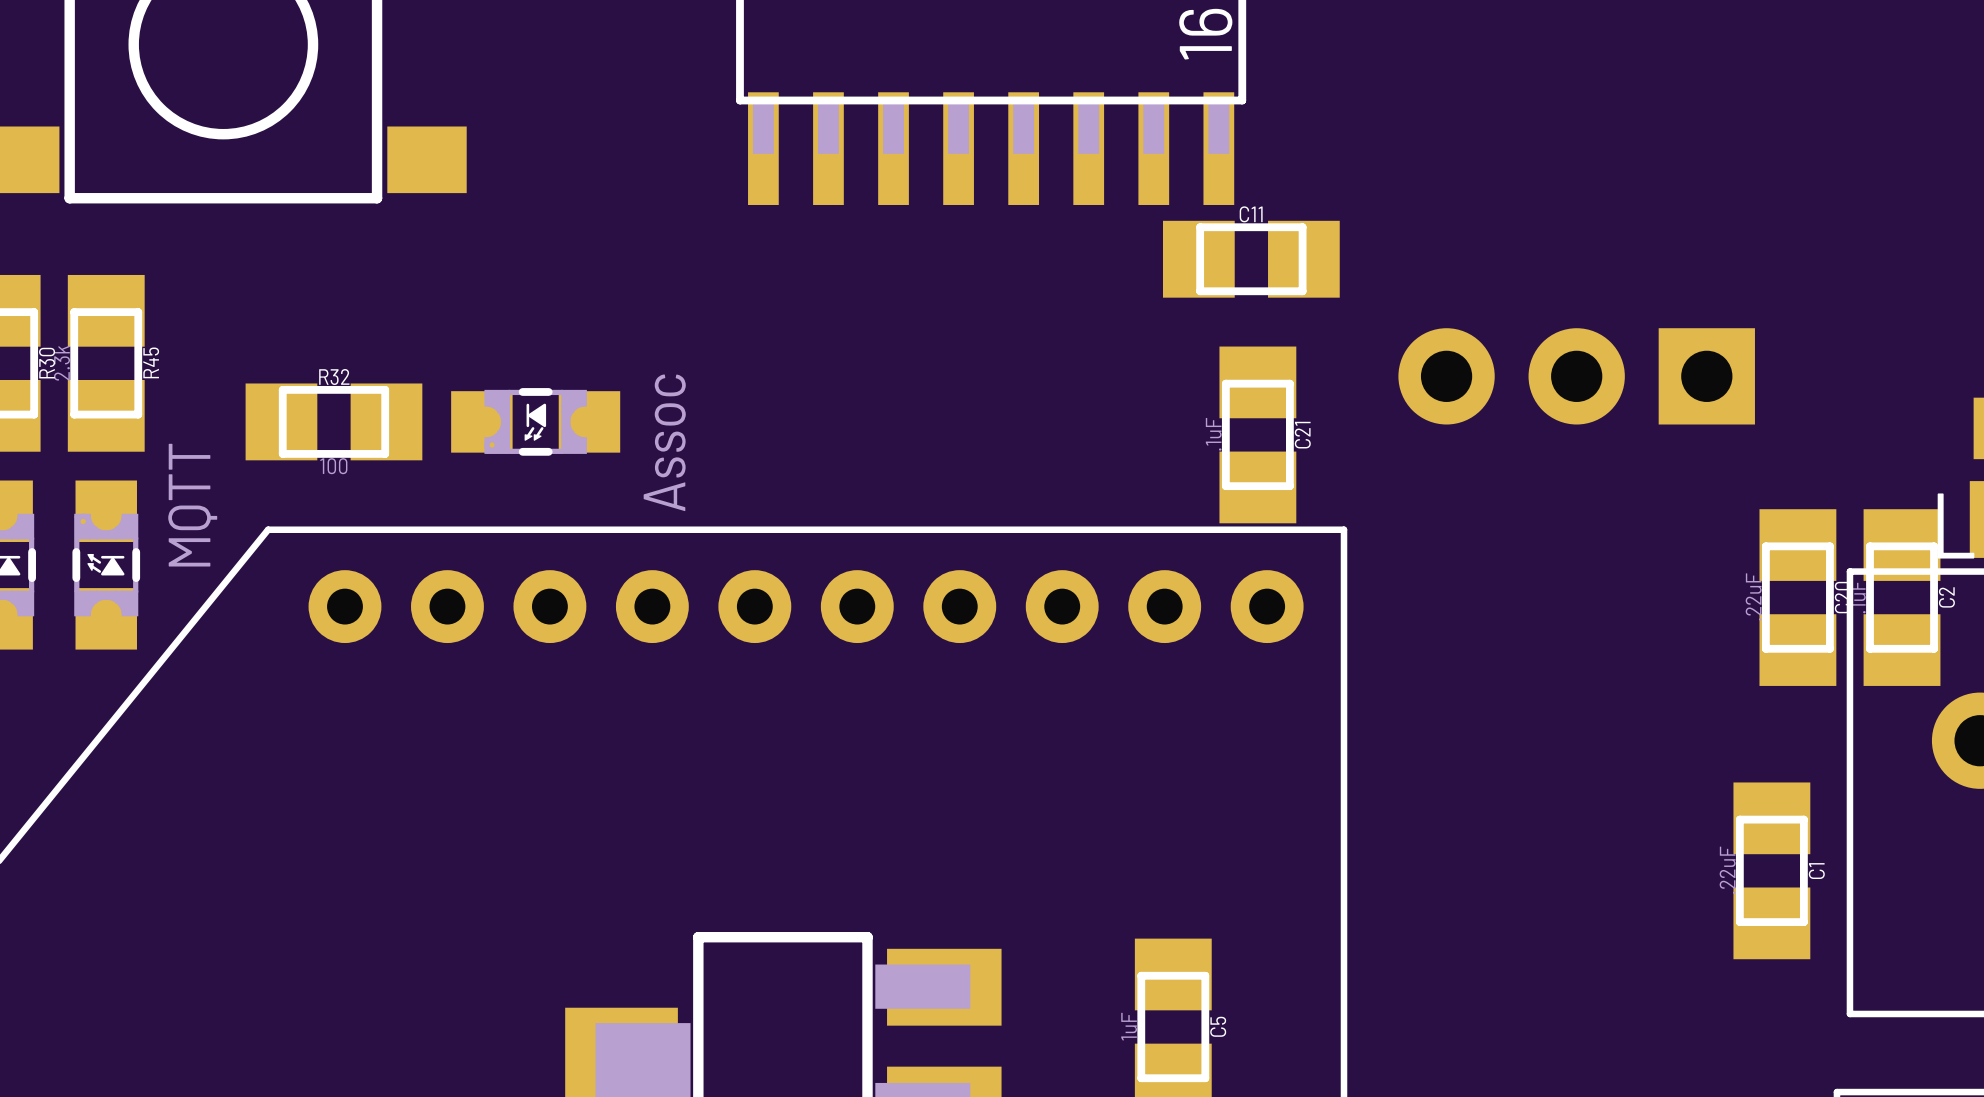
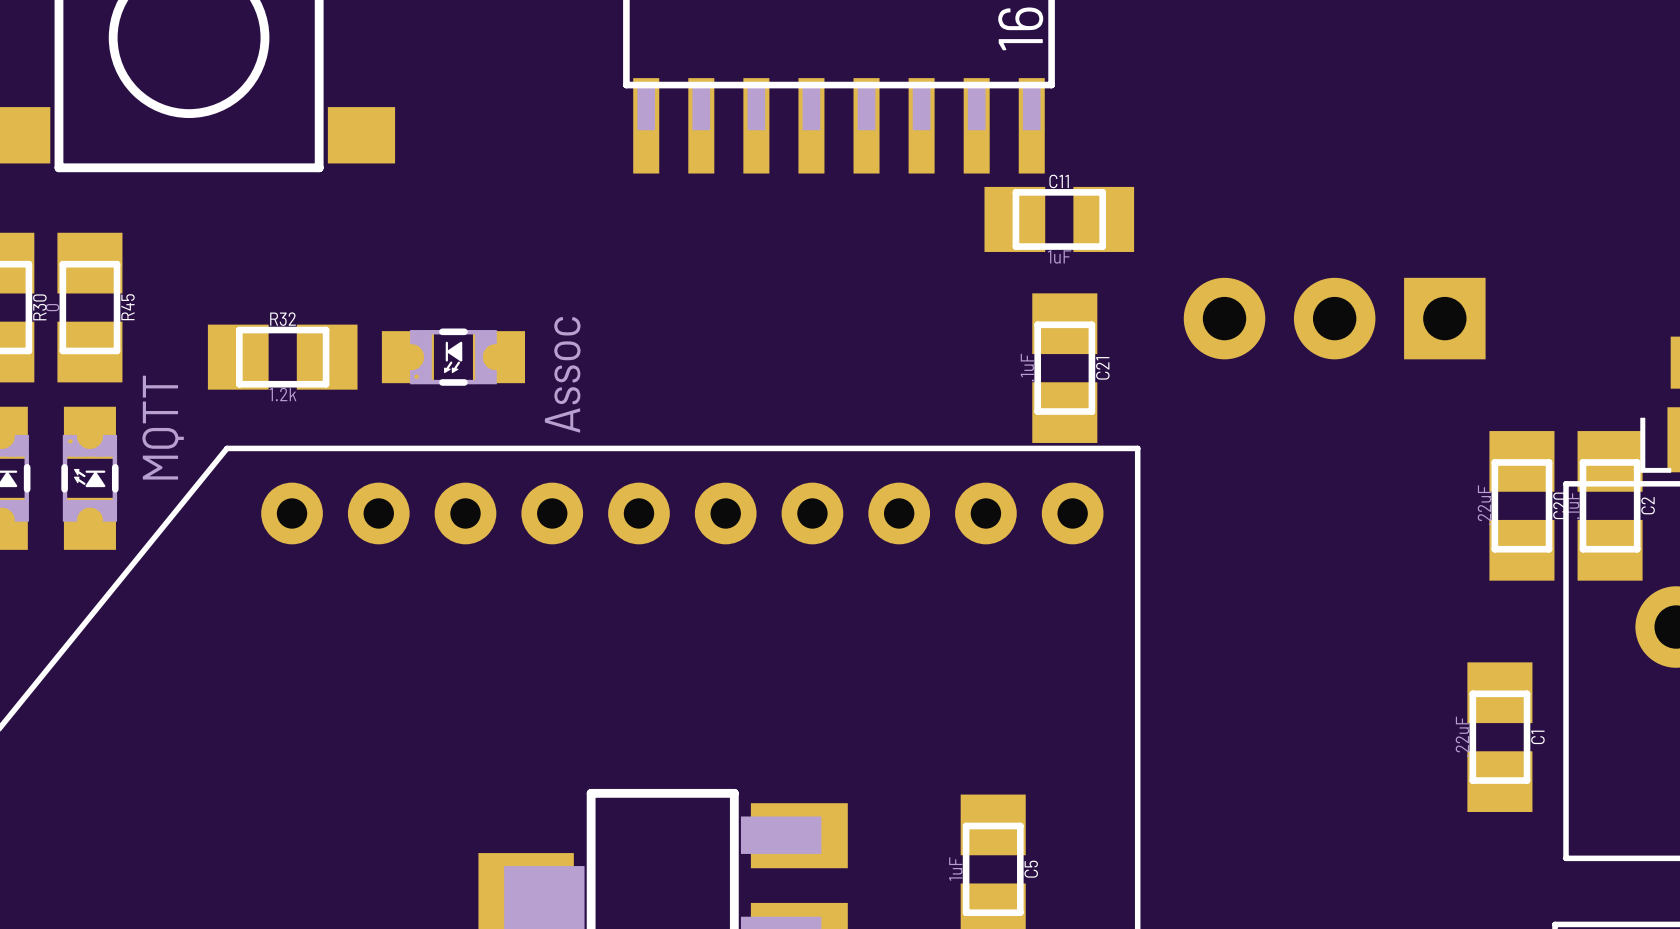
C11 value: none -> 1uF (1059, 256)
R45 value: 2.3k (62, 363) -> 0 (52, 307)
R32 value: 100 (333, 466) -> 1.2k (282, 394)

